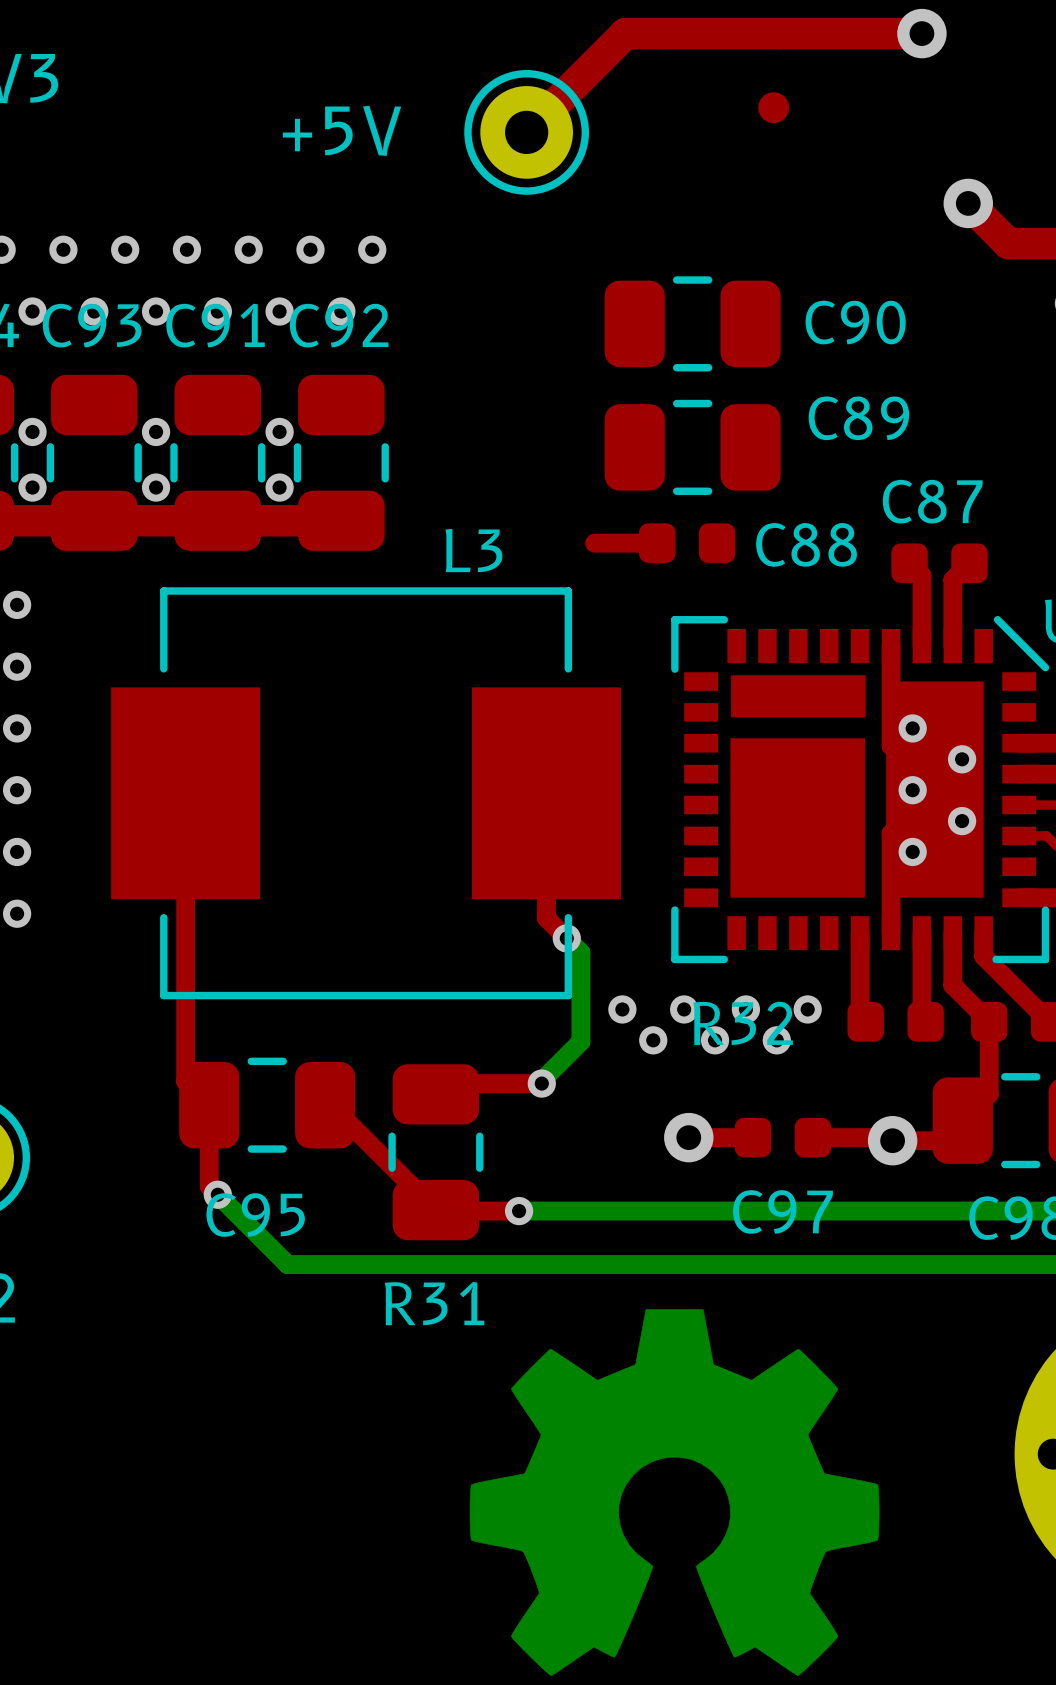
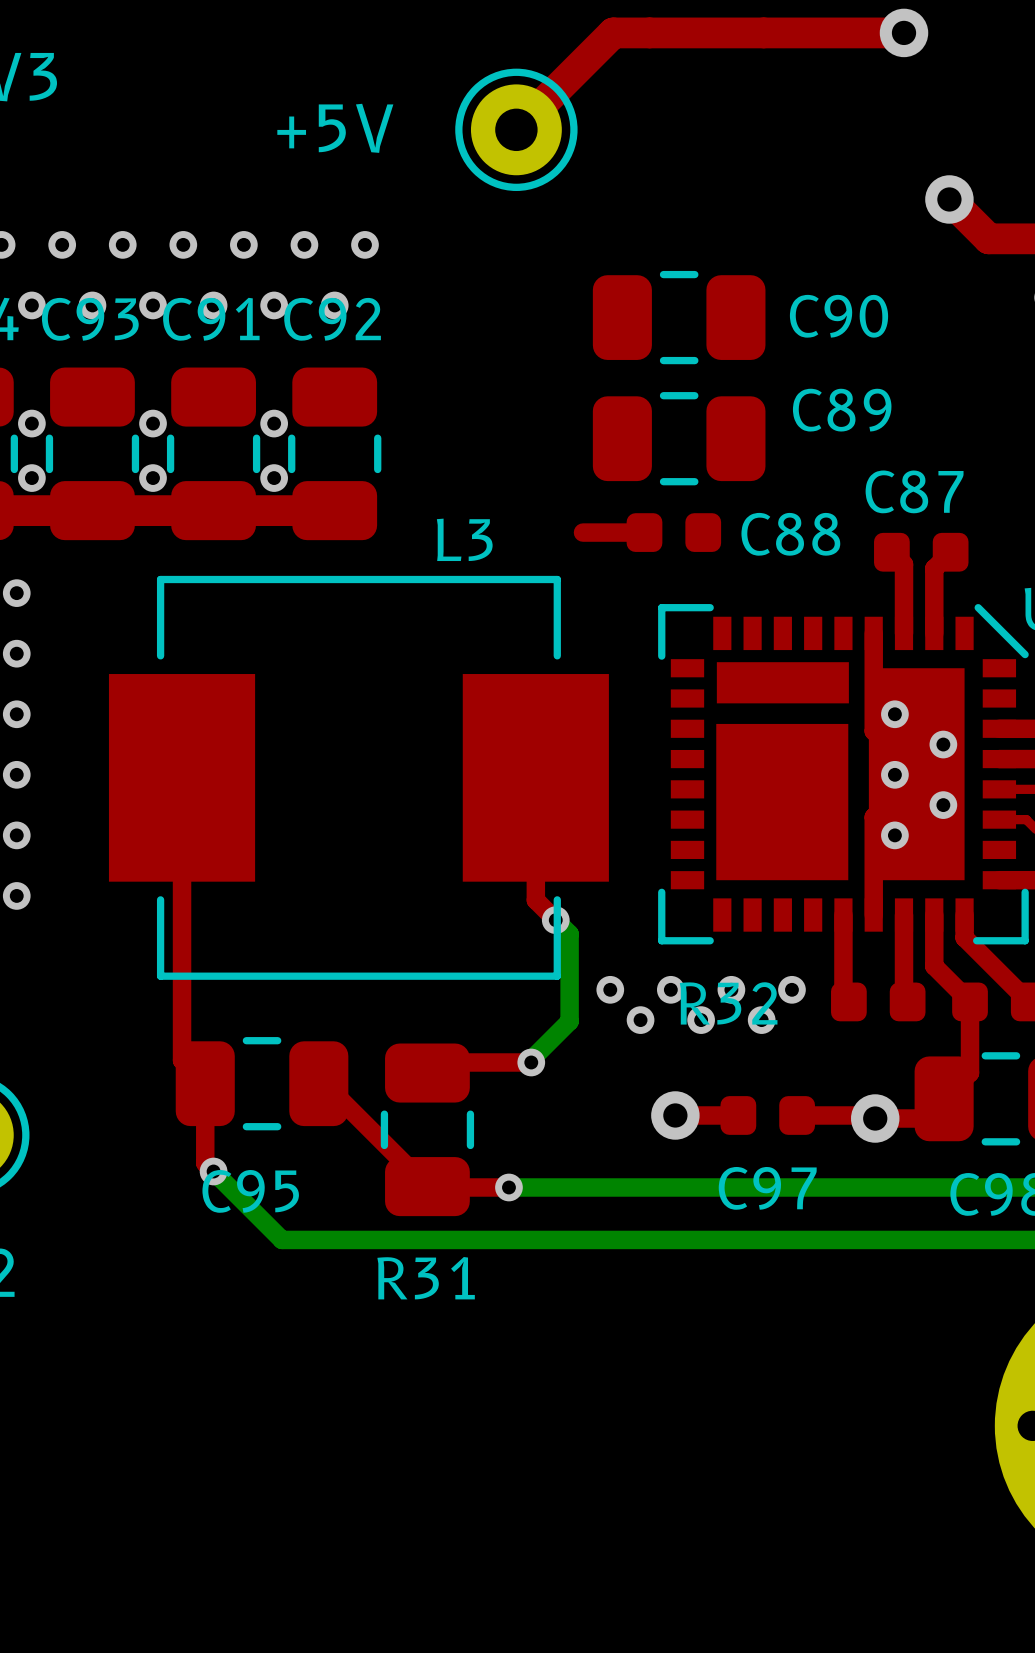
part: (773, 107) -> none
drawing: [469, 1309, 880, 1676] -> none

